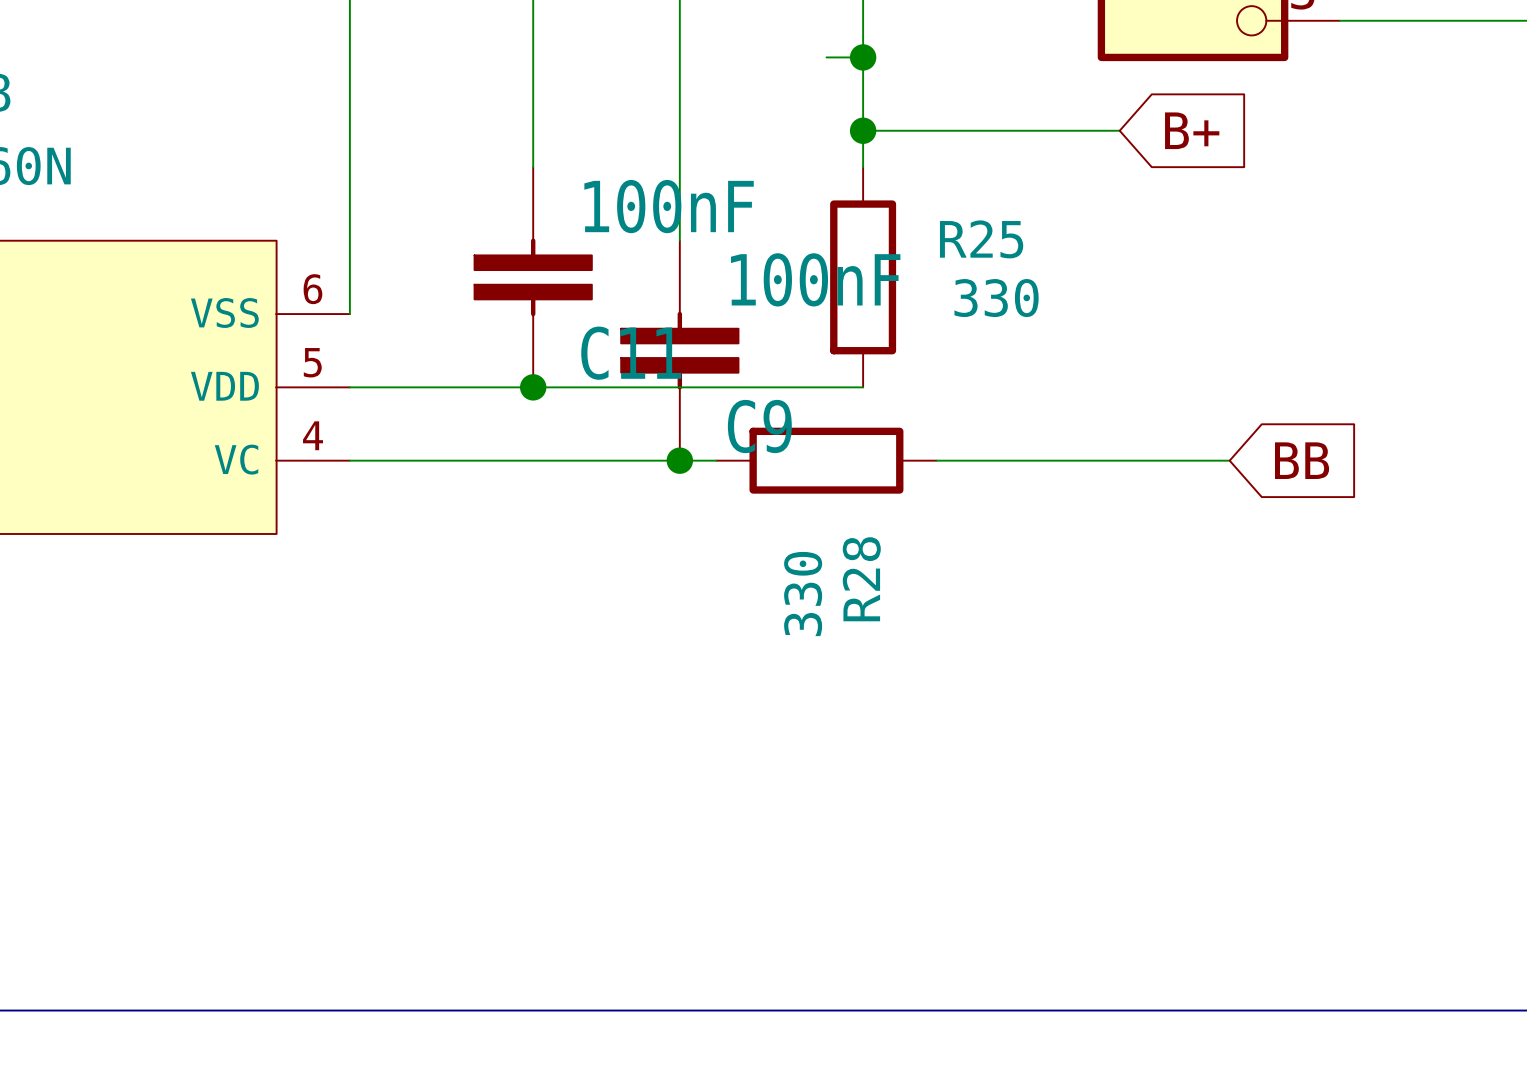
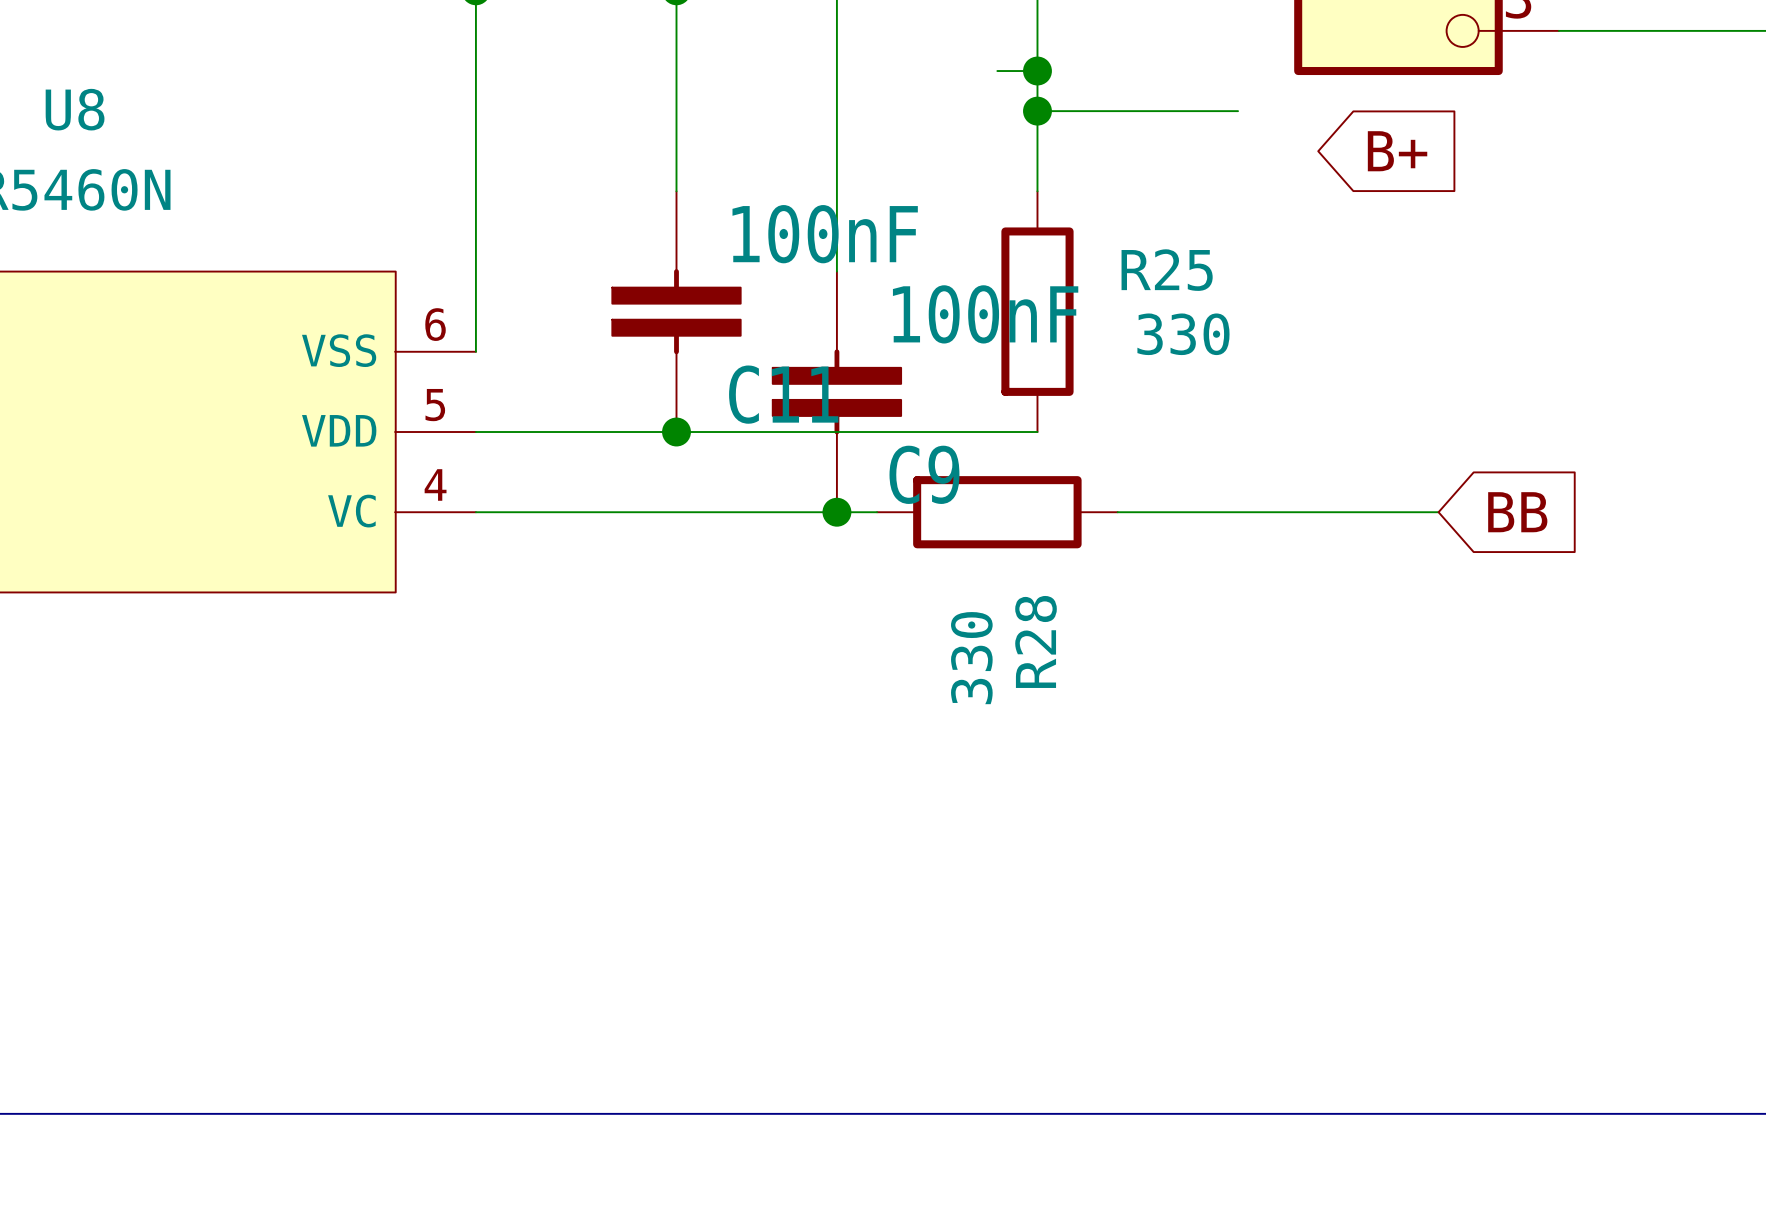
wire: none -> (1037, 111) (1238, 111)
wire: (863, 130) (1119, 130) -> none
junction position: (863, 130) -> (1037, 111)

